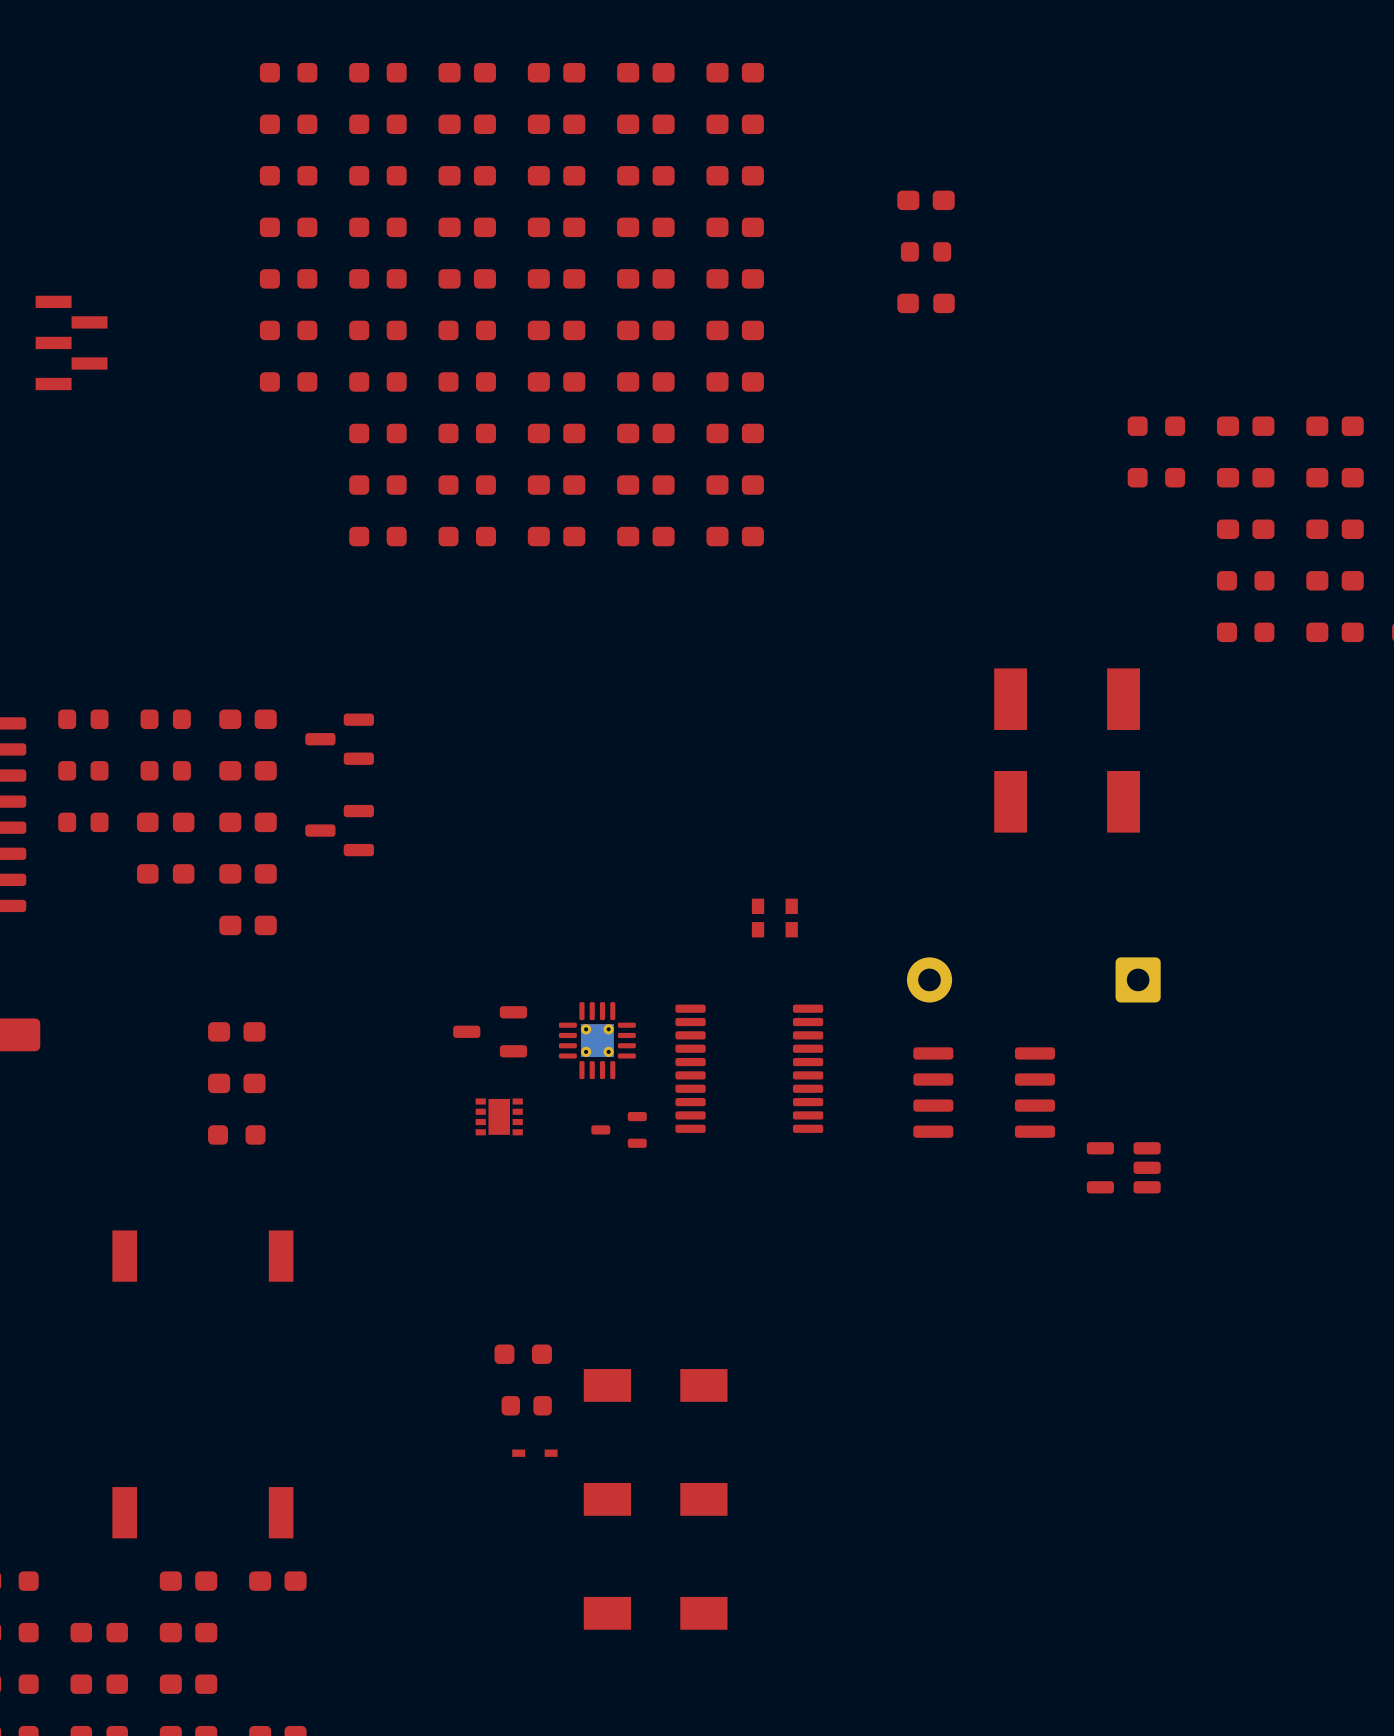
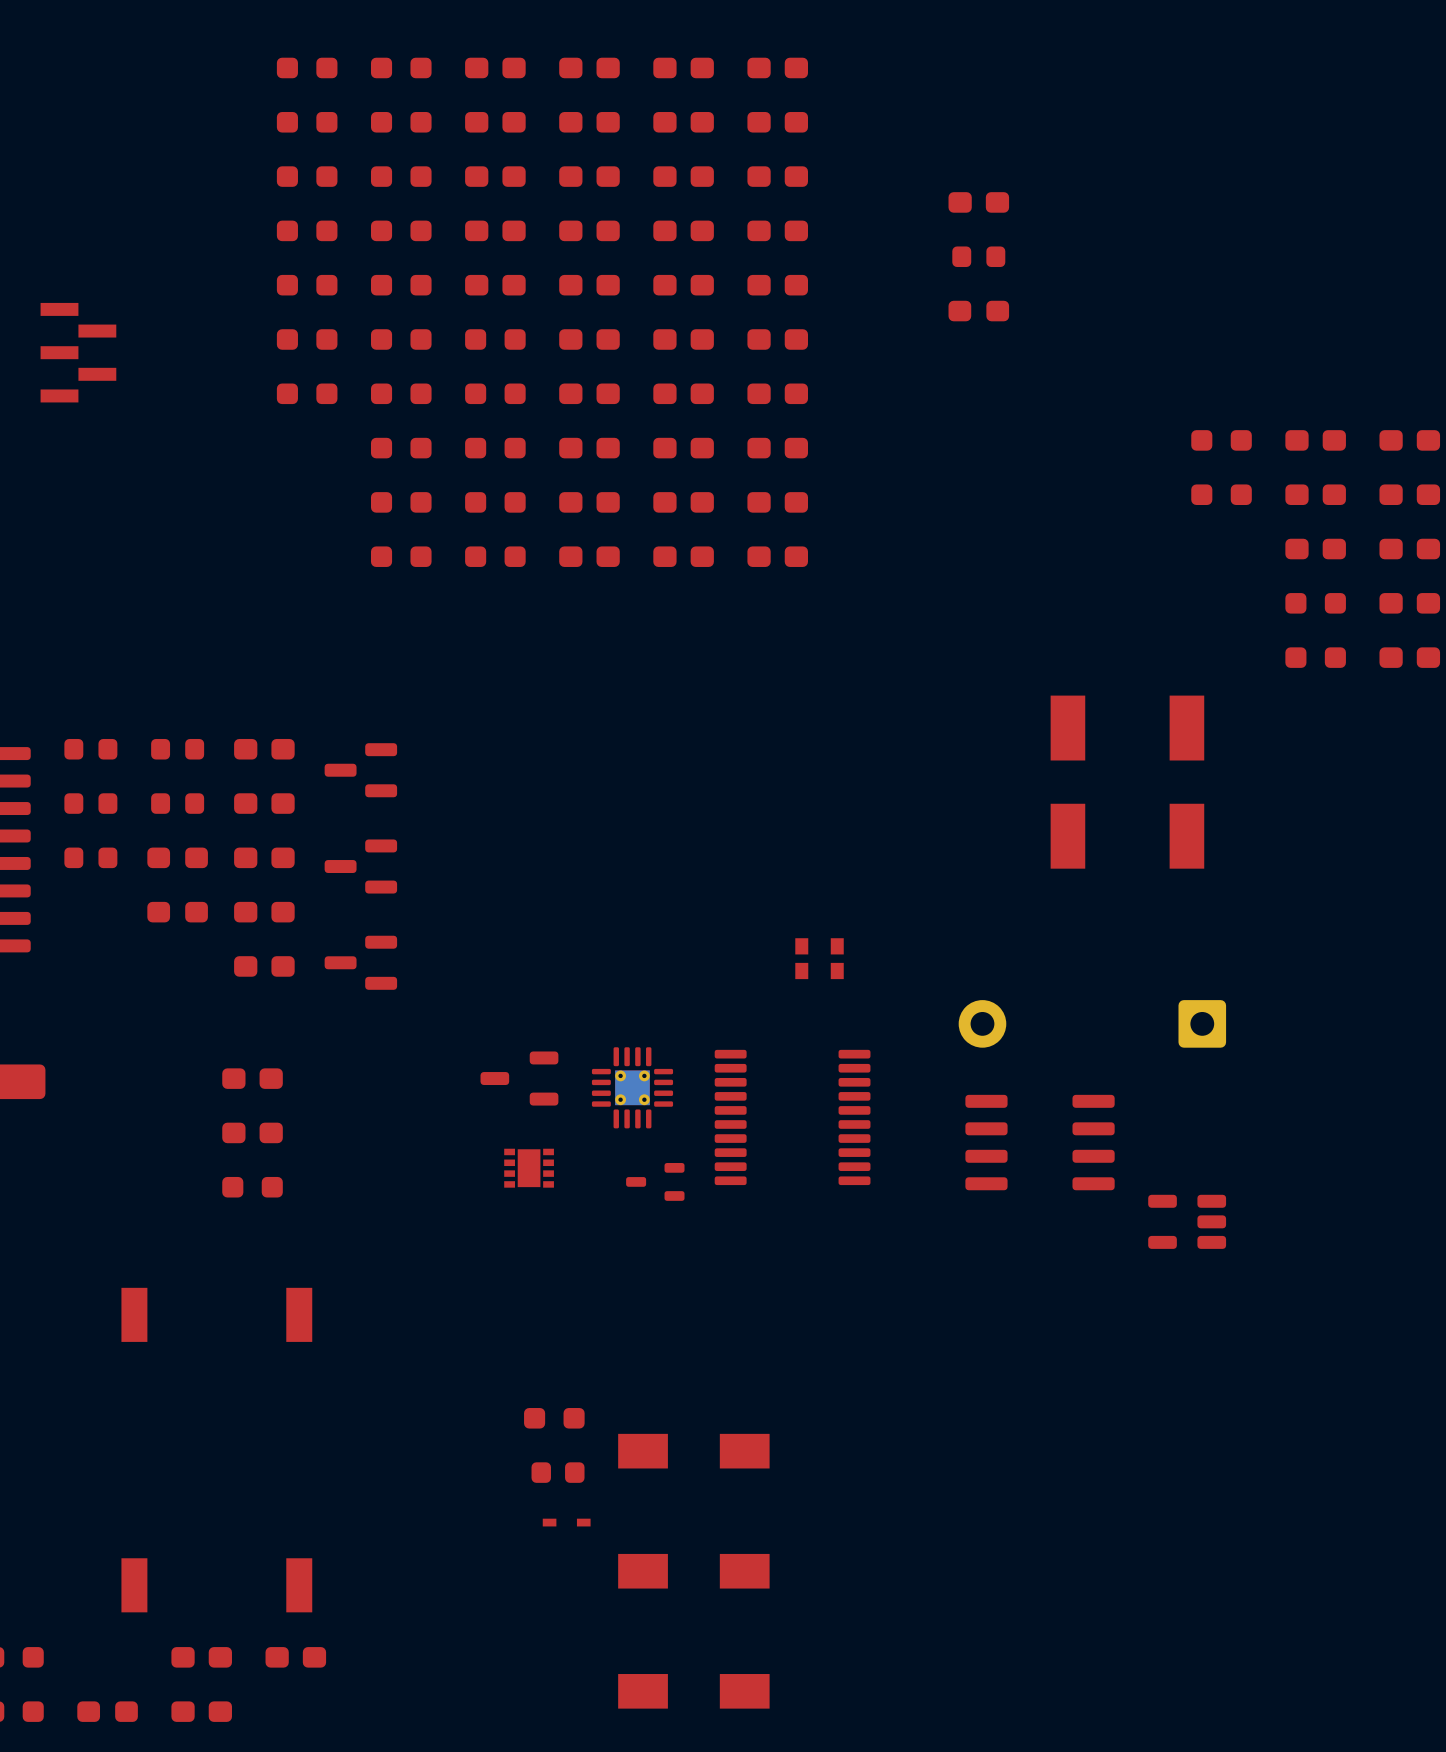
part: none -> (360, 962)

